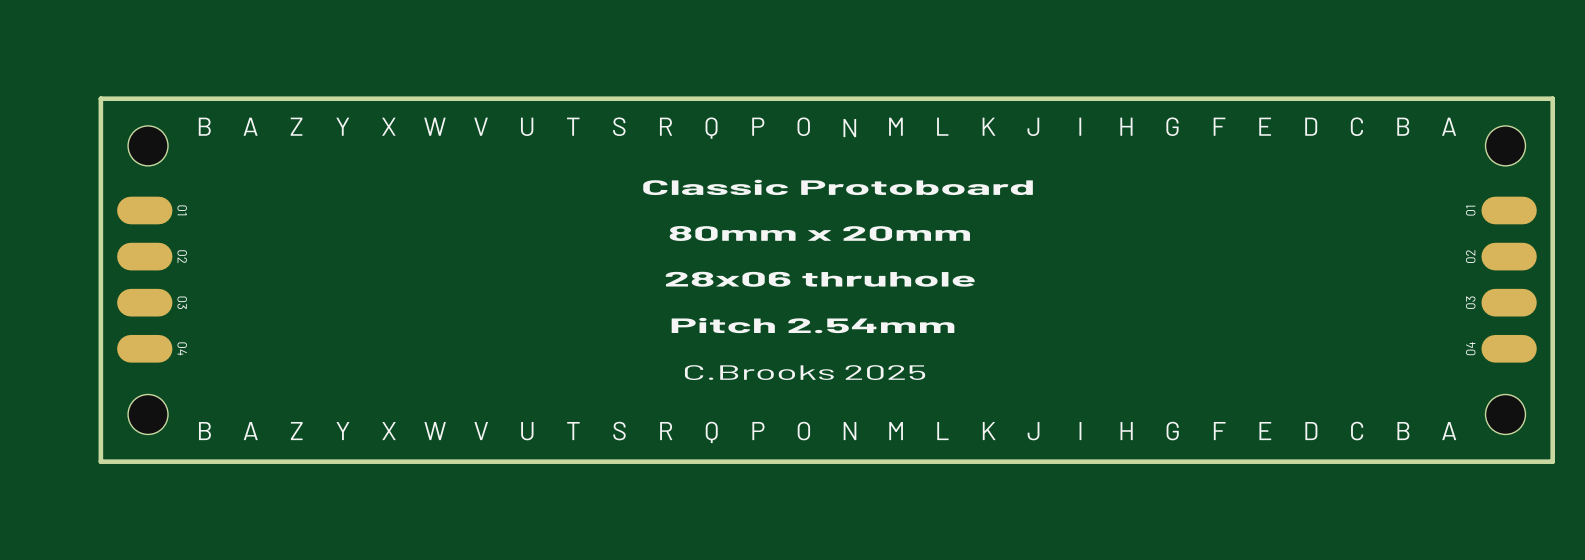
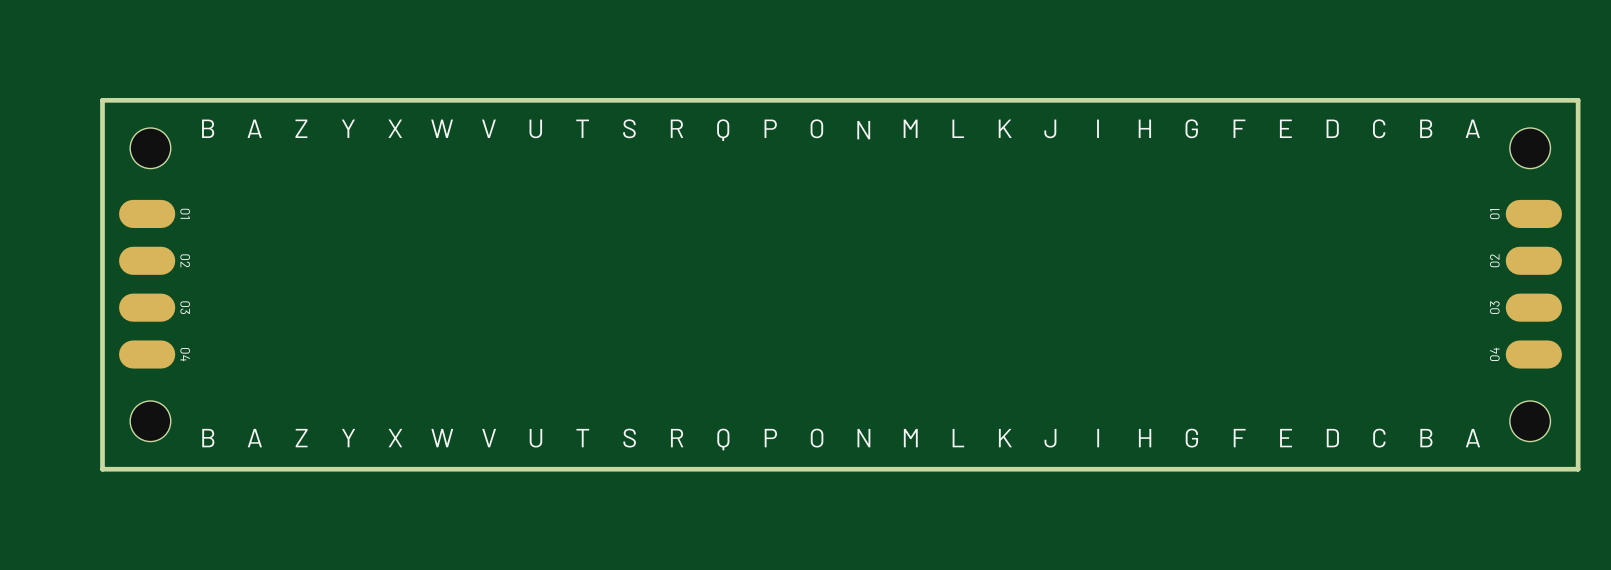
text: Classic Protoboard (838, 187) -> none
text: 80mm x 20mm (819, 233) -> none
text: 28x06 thruhole (820, 279) -> none
text: Pitch 2.54mm (813, 325) -> none
text: C.Brooks 2025 (805, 372) -> none

